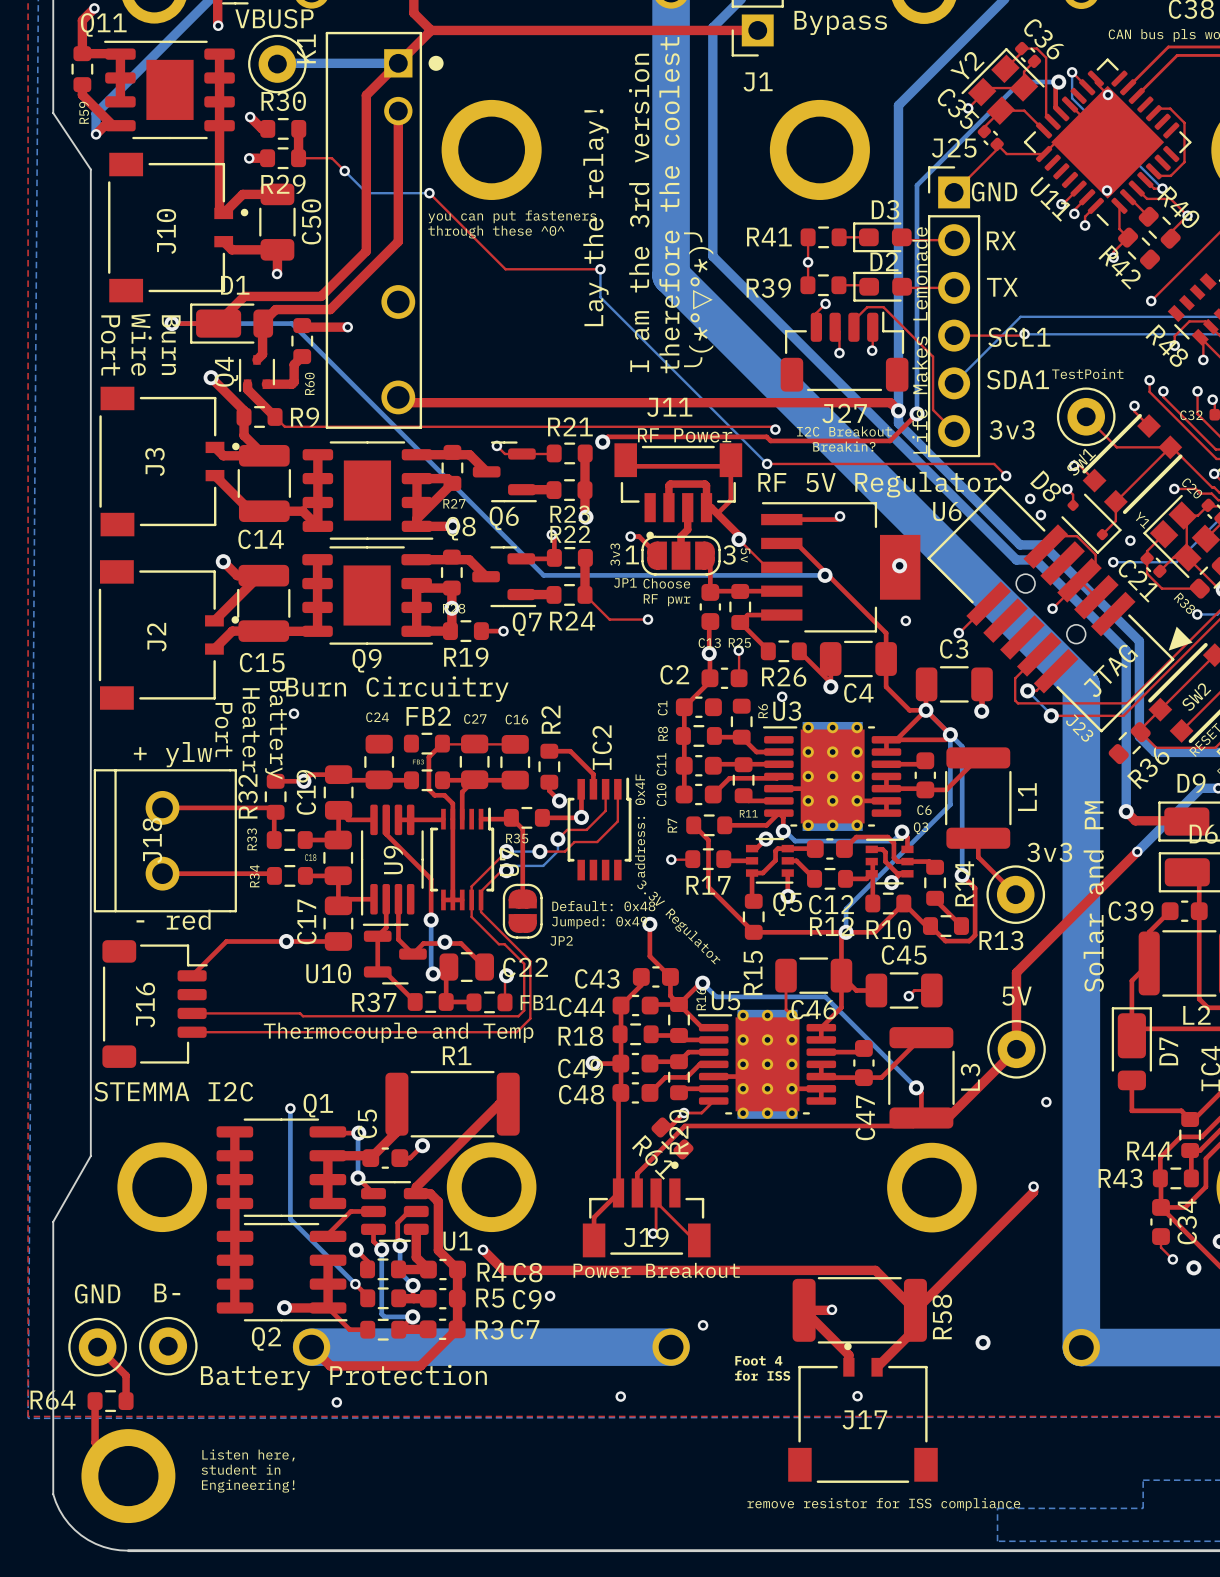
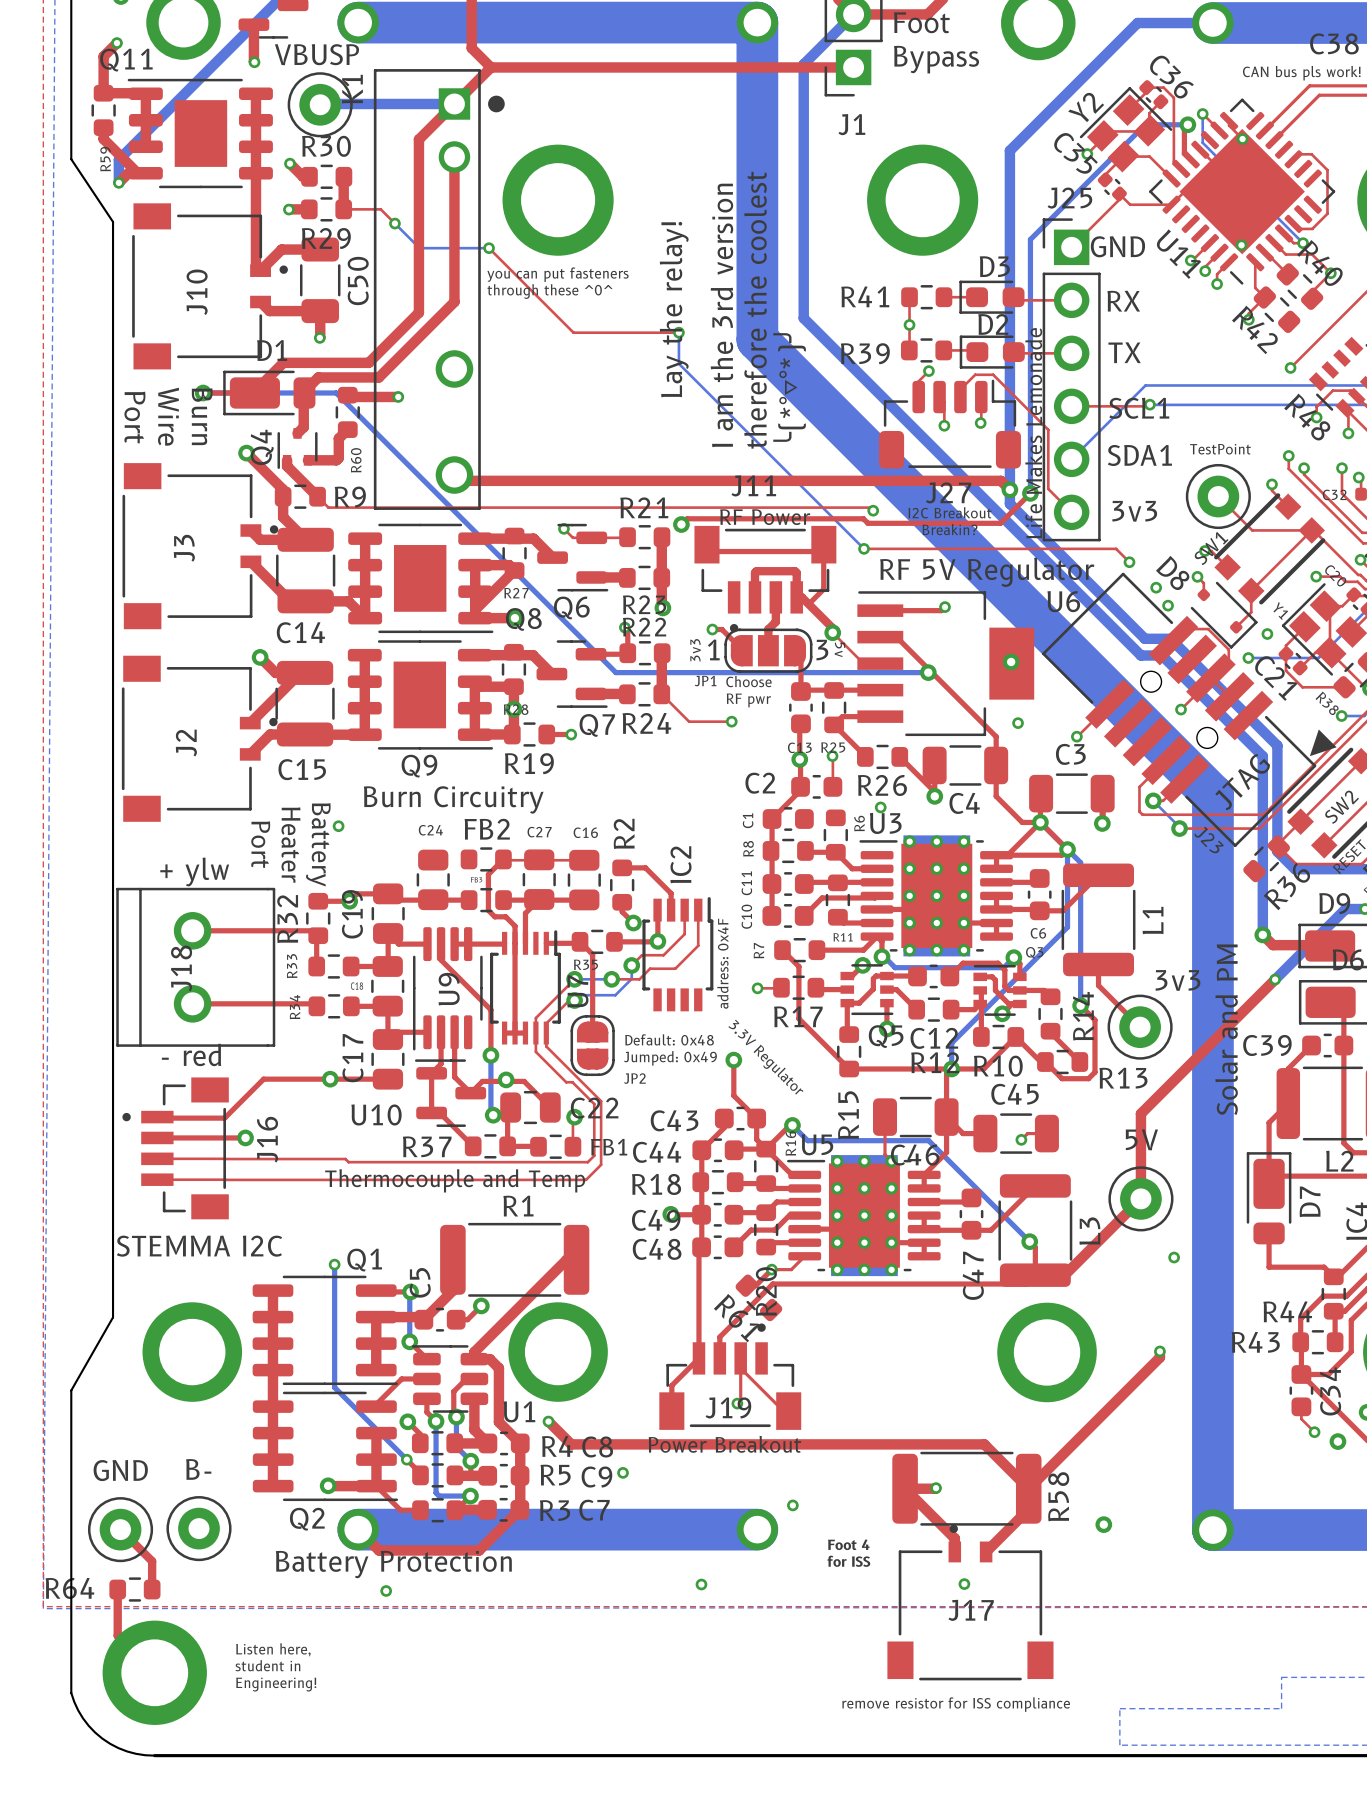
J16 footprint: [102, 940, 208, 1068] -> [122, 1077, 229, 1220]
top track: none -> (225, 1117) (157, 1118)
top track: none -> (157, 1137) (245, 1137)
via: none -> (245, 1137)
J16 name position: J16 (145, 1005) -> J16 (267, 1139)
top track: none -> (157, 1158) (225, 1158)
top track: none -> (157, 1179) (225, 1179)

